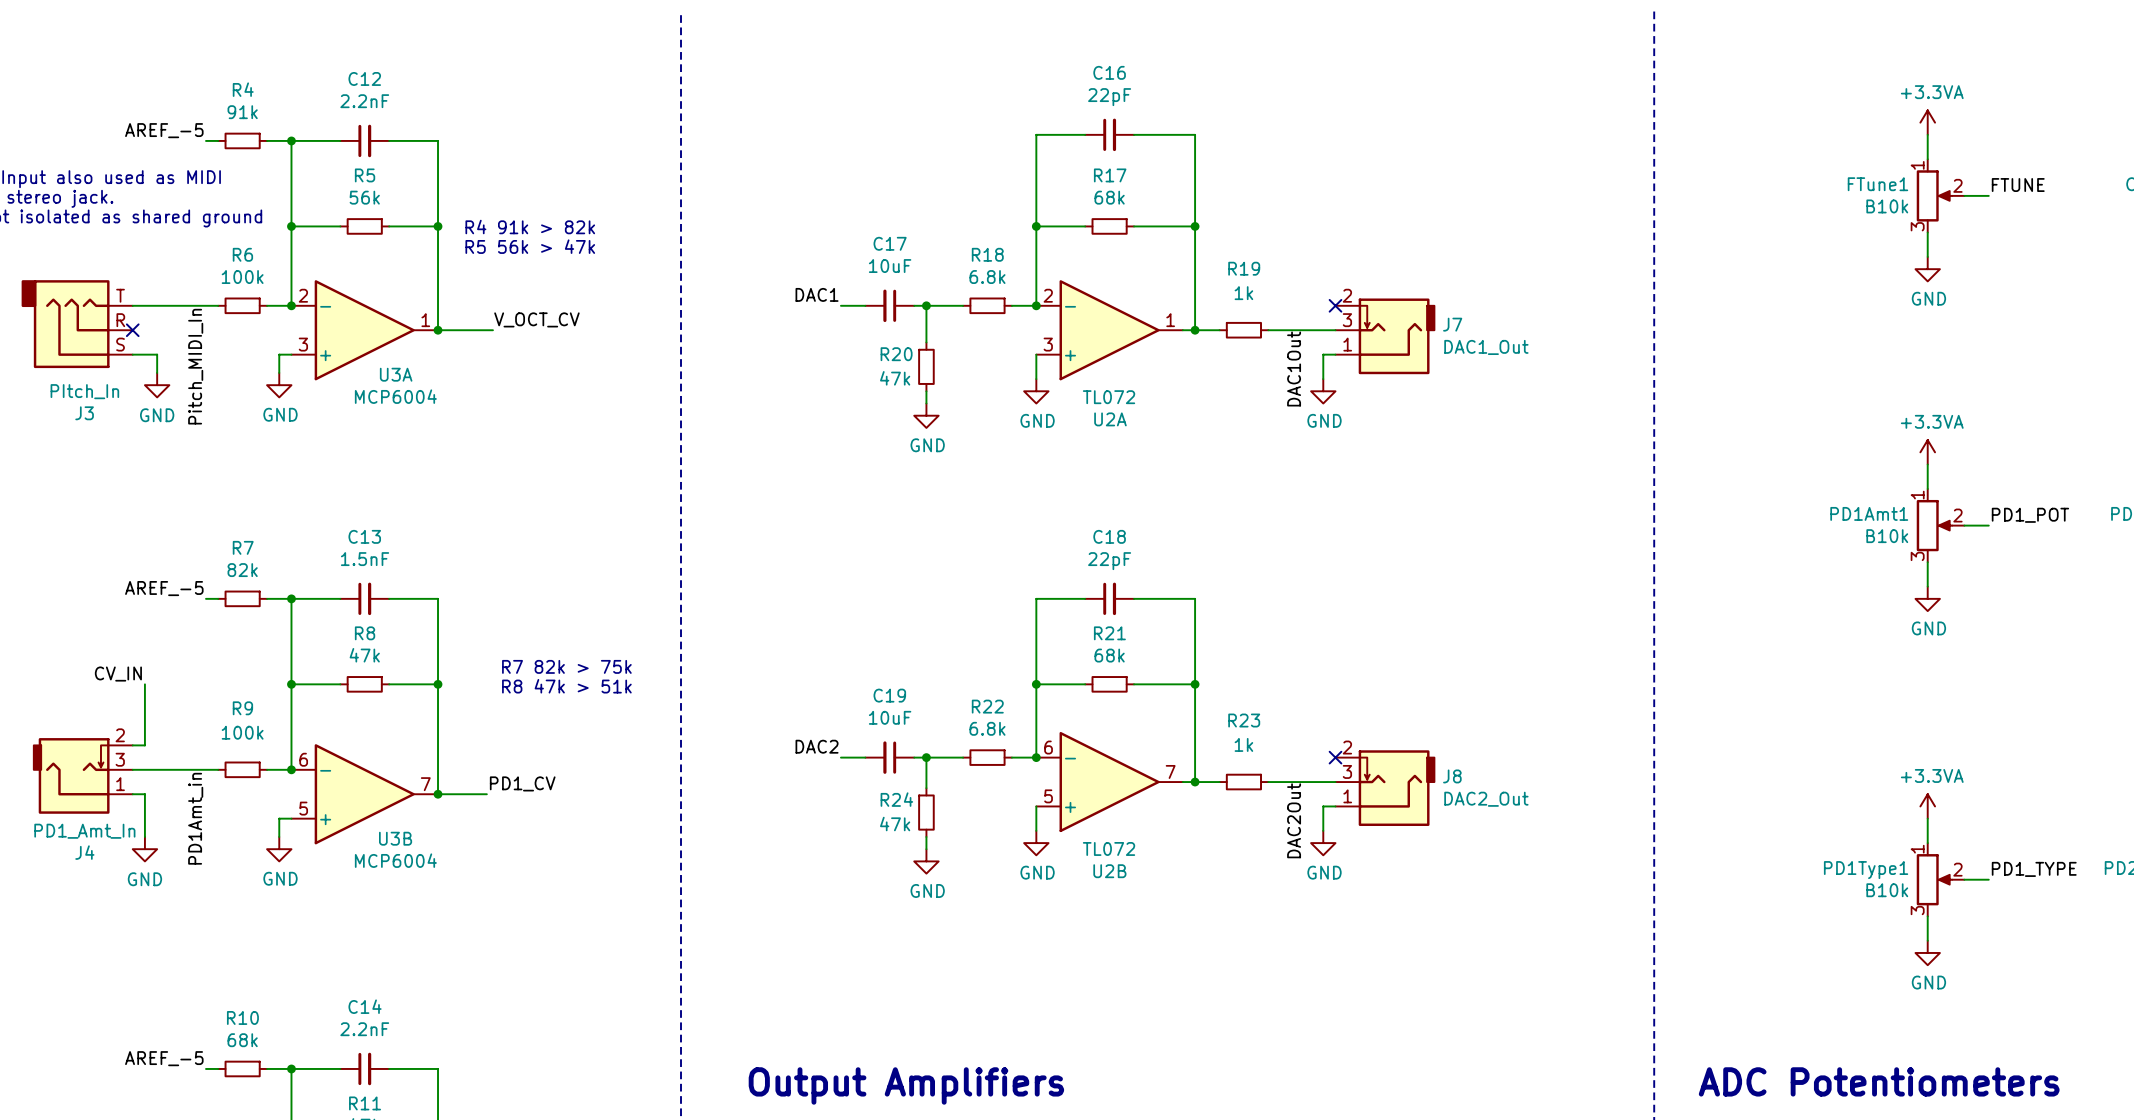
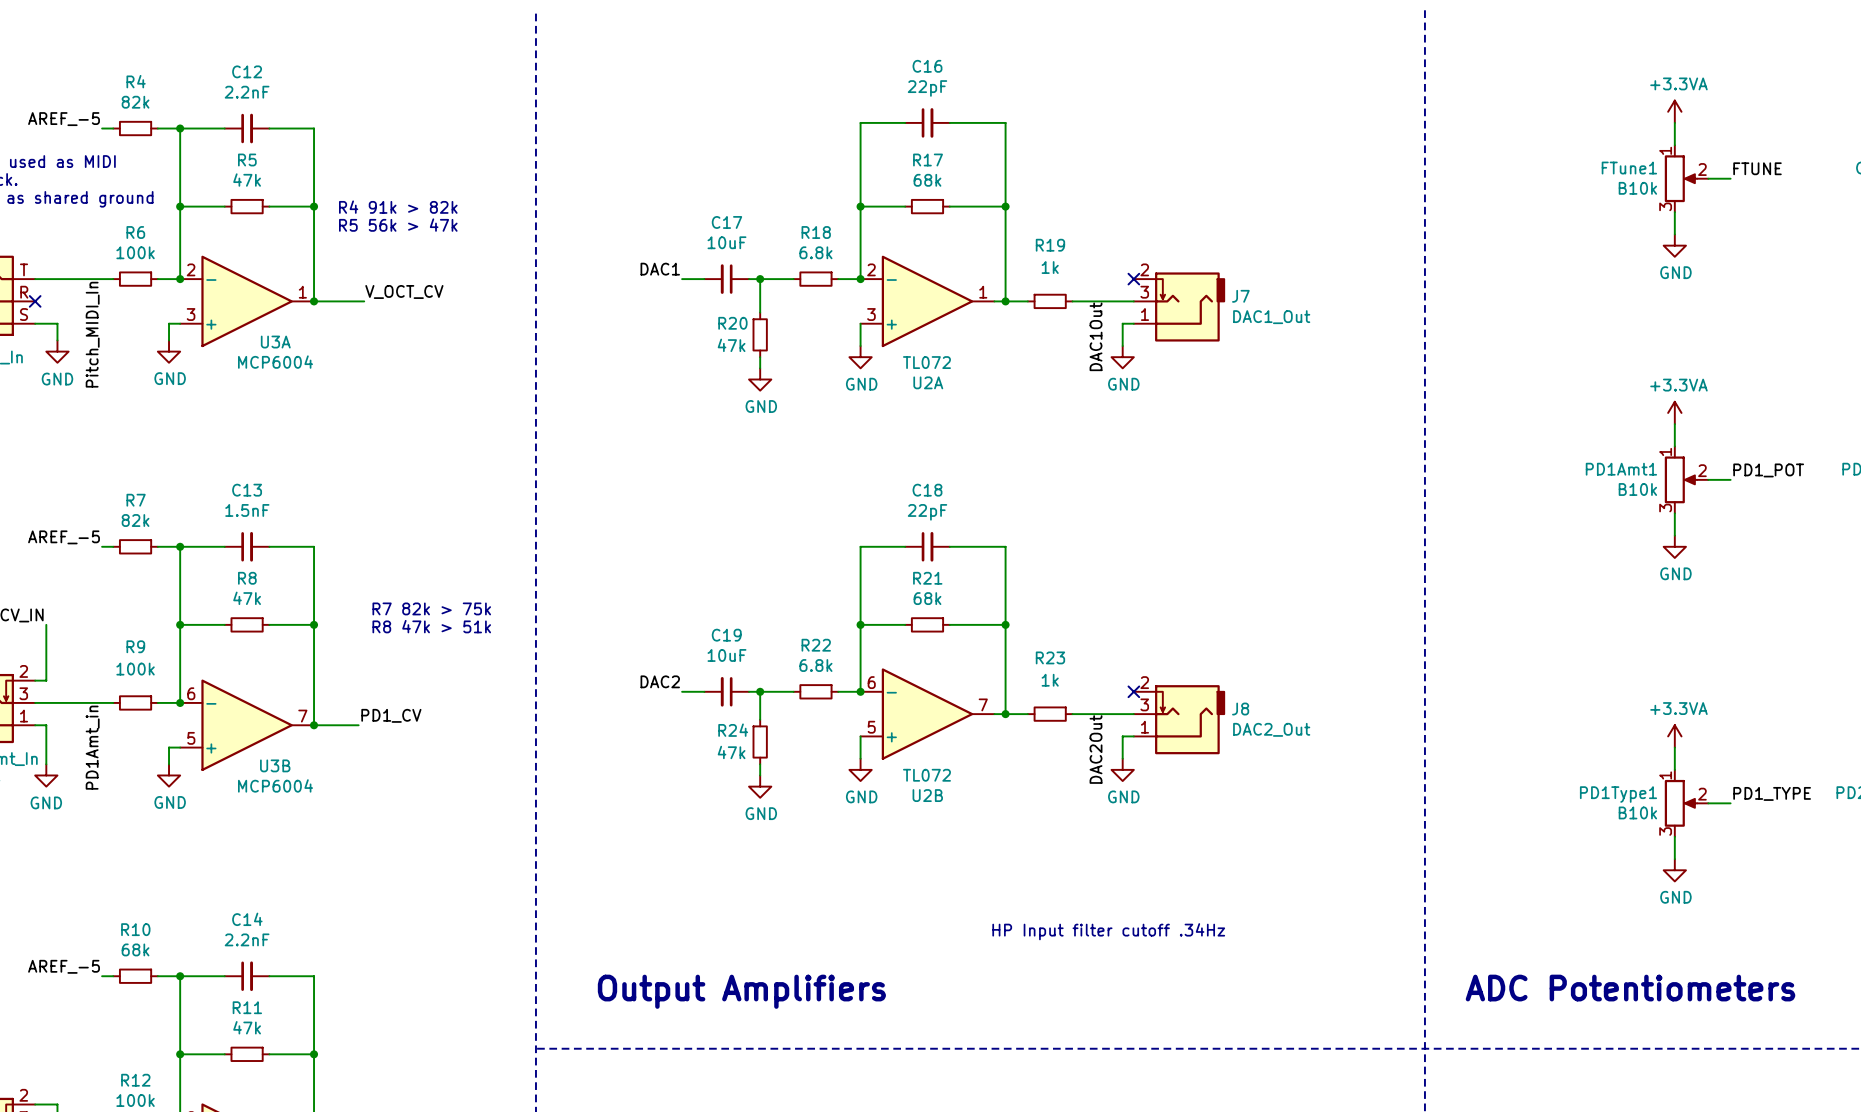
R4 value: 91k (242, 112) -> 82k (135, 102)
R5 value: 56k (364, 197) -> 47k (247, 180)
text: none -> HP Input filter cutoff .34Hz (1108, 931)

